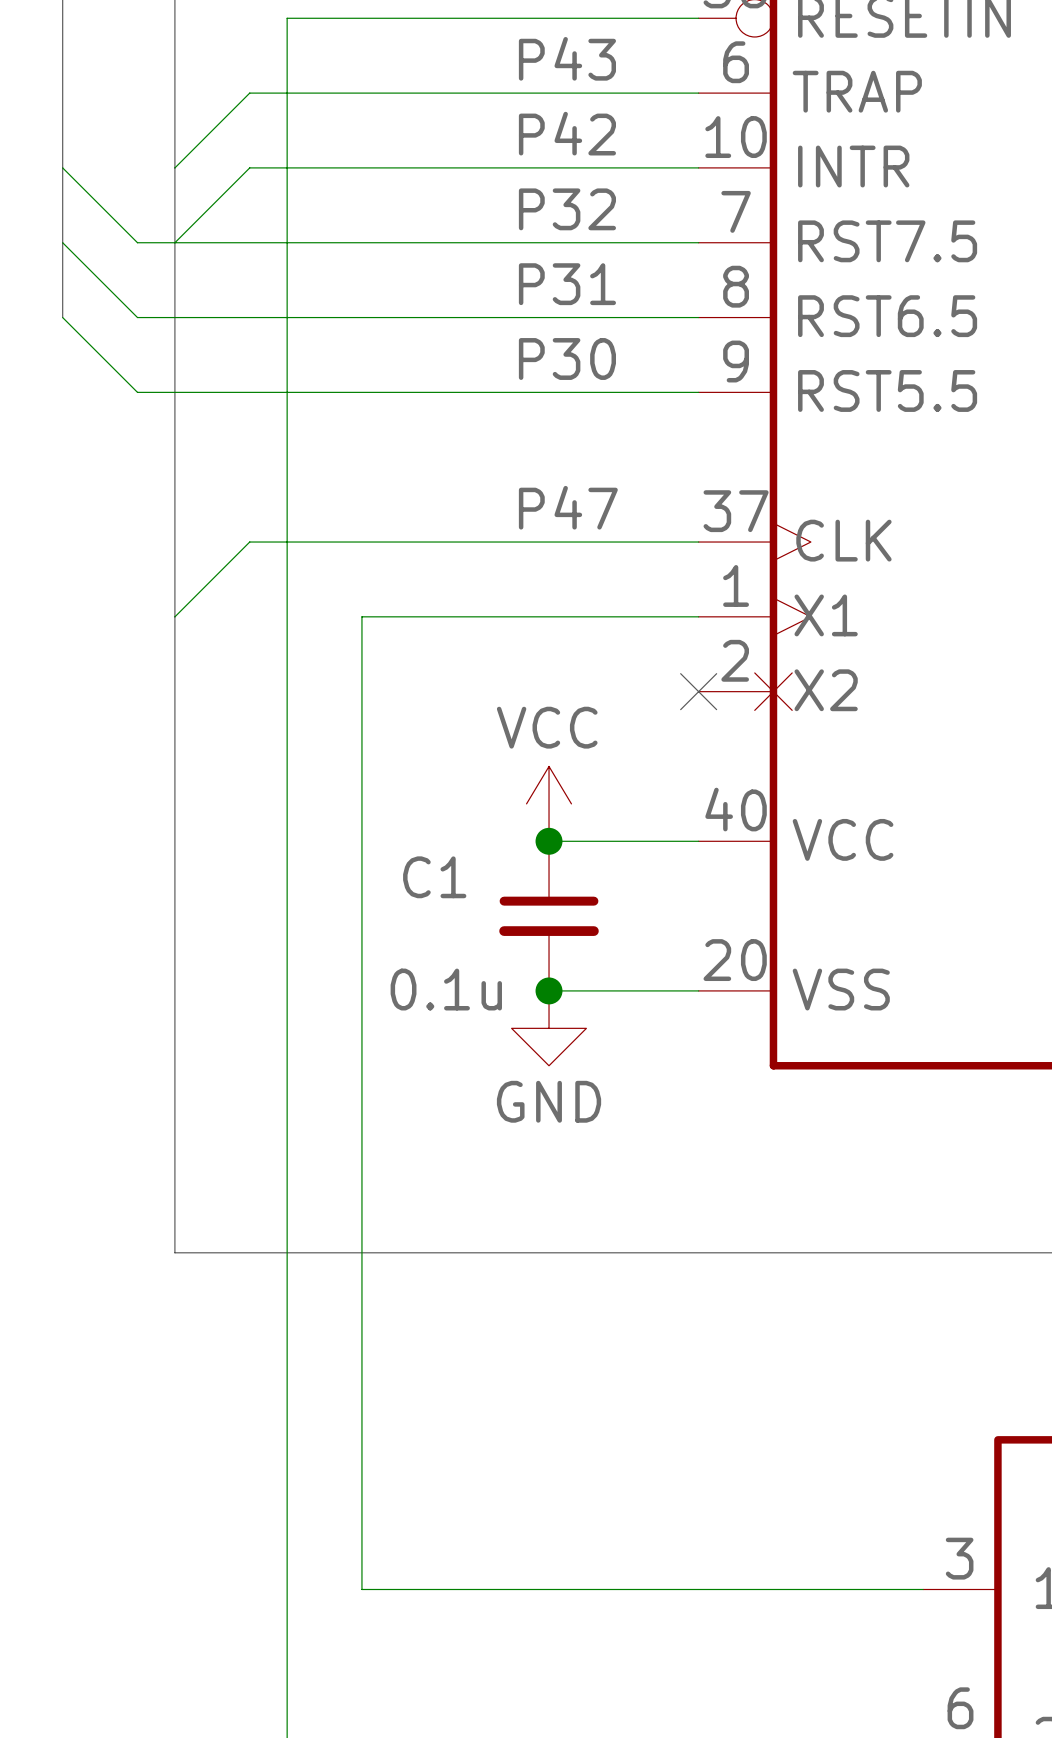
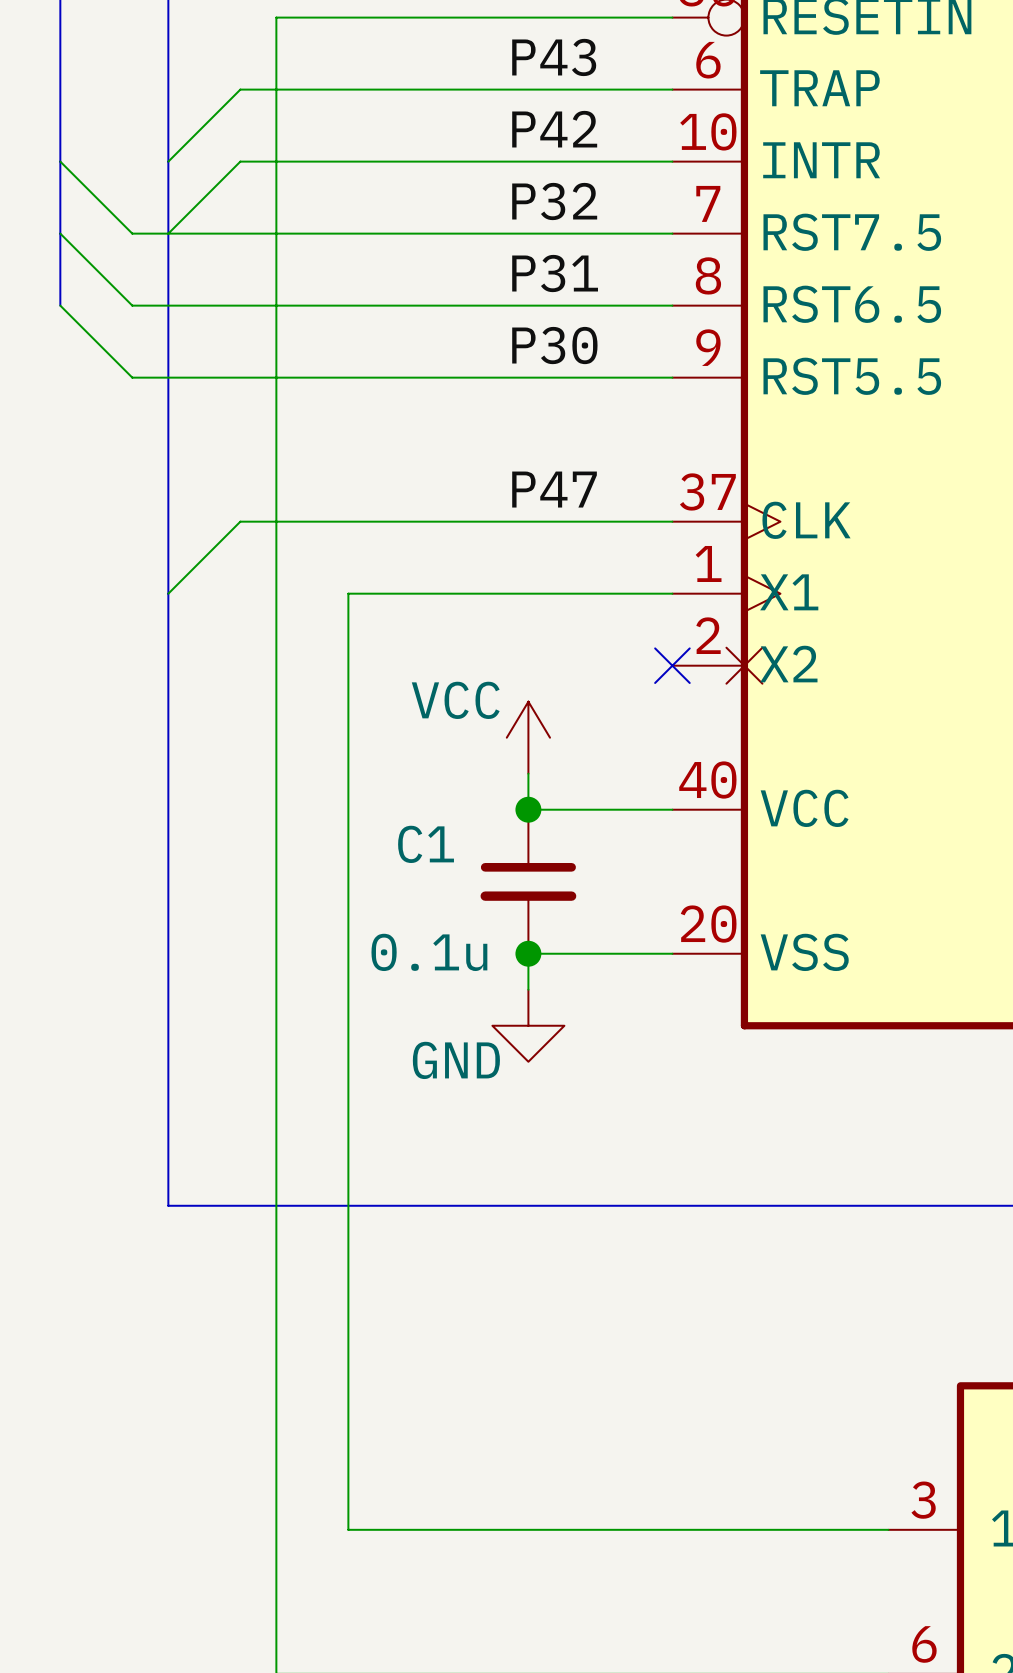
power symbol text position: VCC (547, 727) -> VCC (455, 700)
power symbol position: VCC (549, 803) -> VCC (528, 737)
power symbol position: GND (549, 1028) -> GND (528, 1025)
power symbol text position: GND (549, 1101) -> GND (456, 1060)

